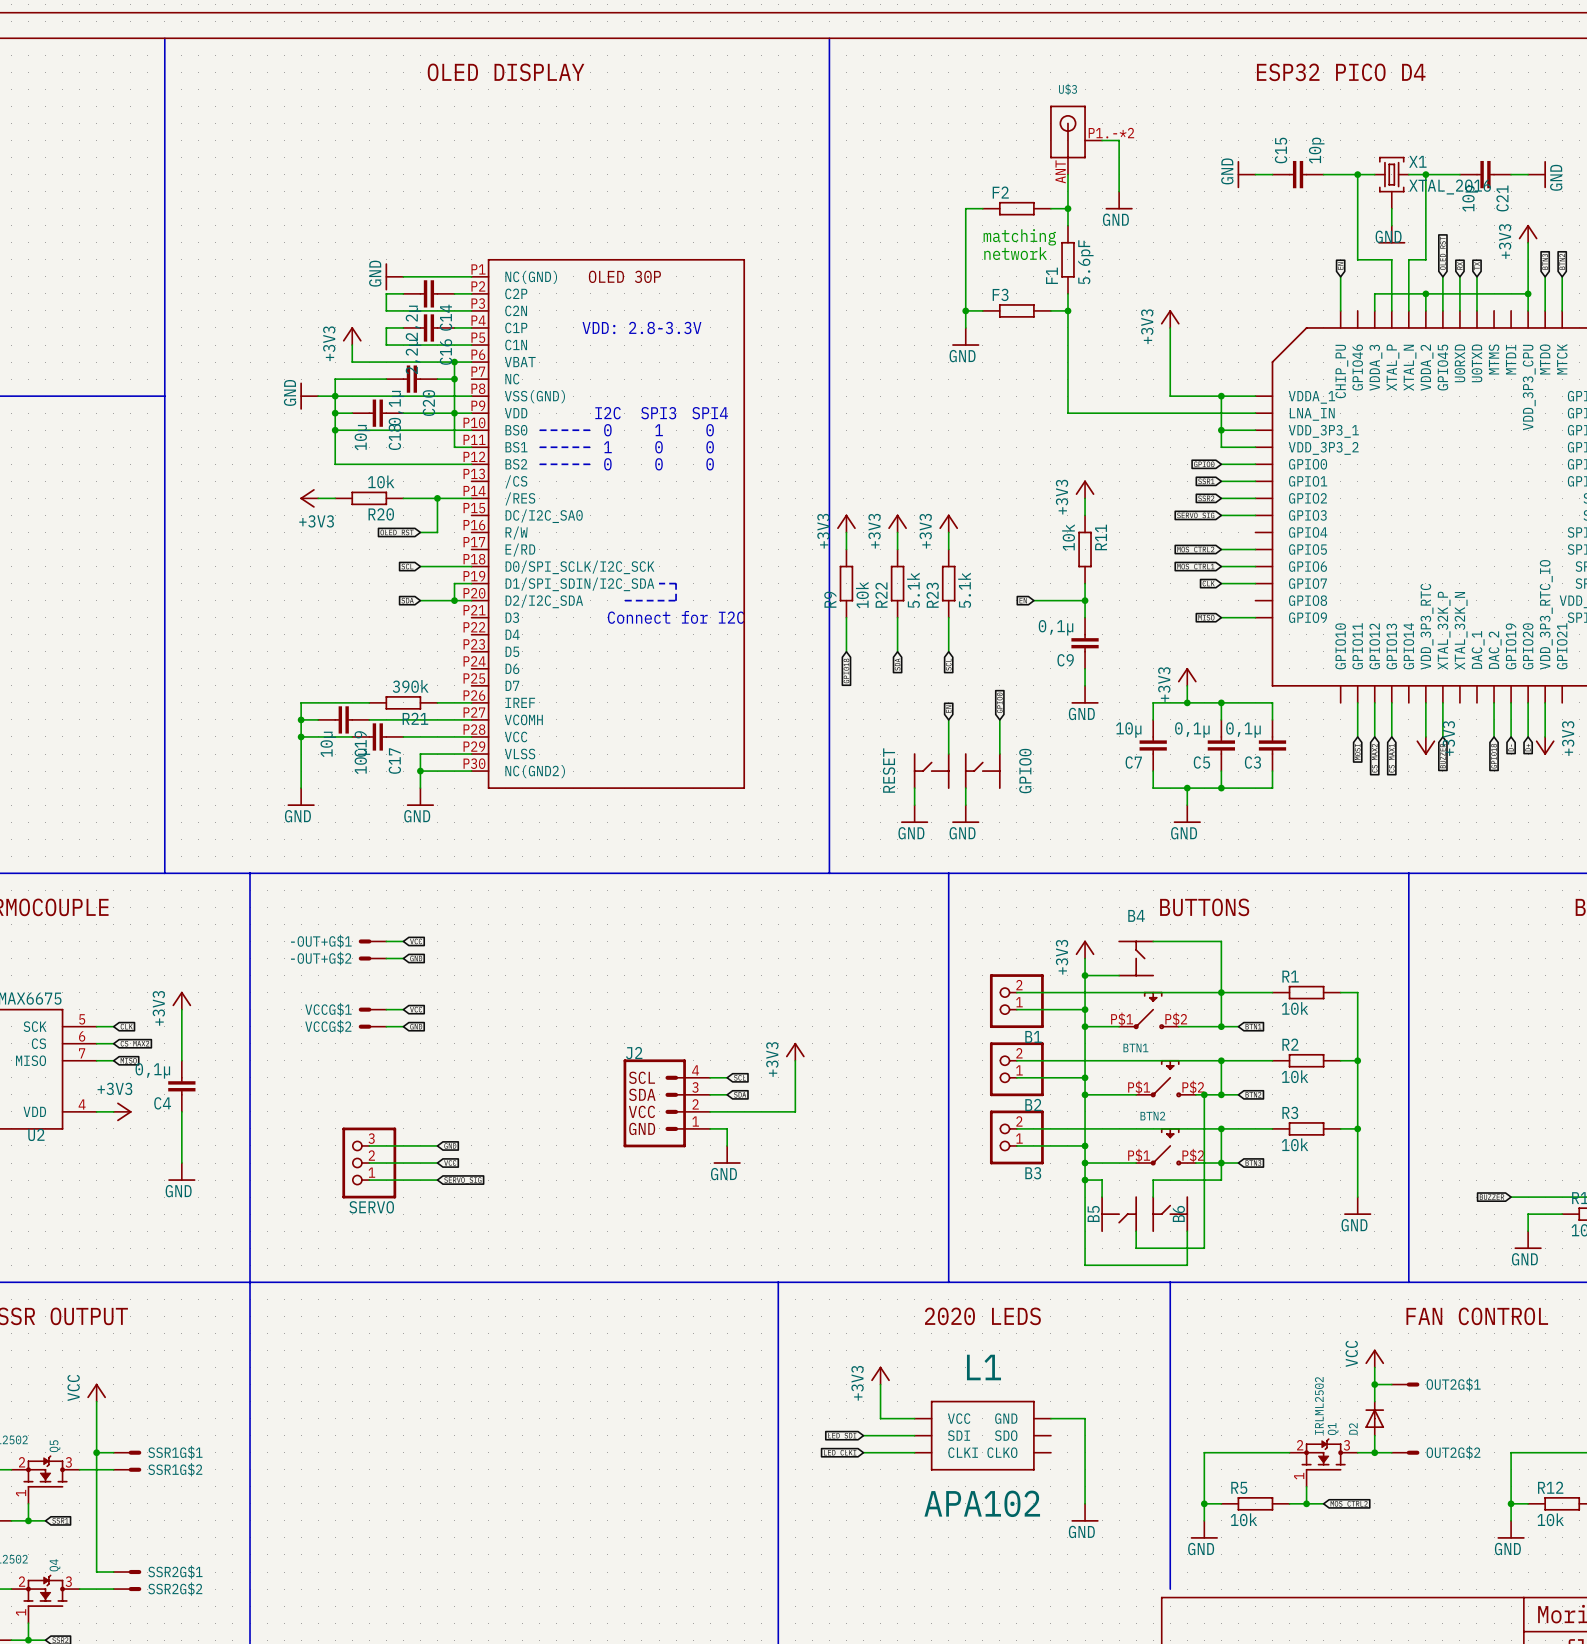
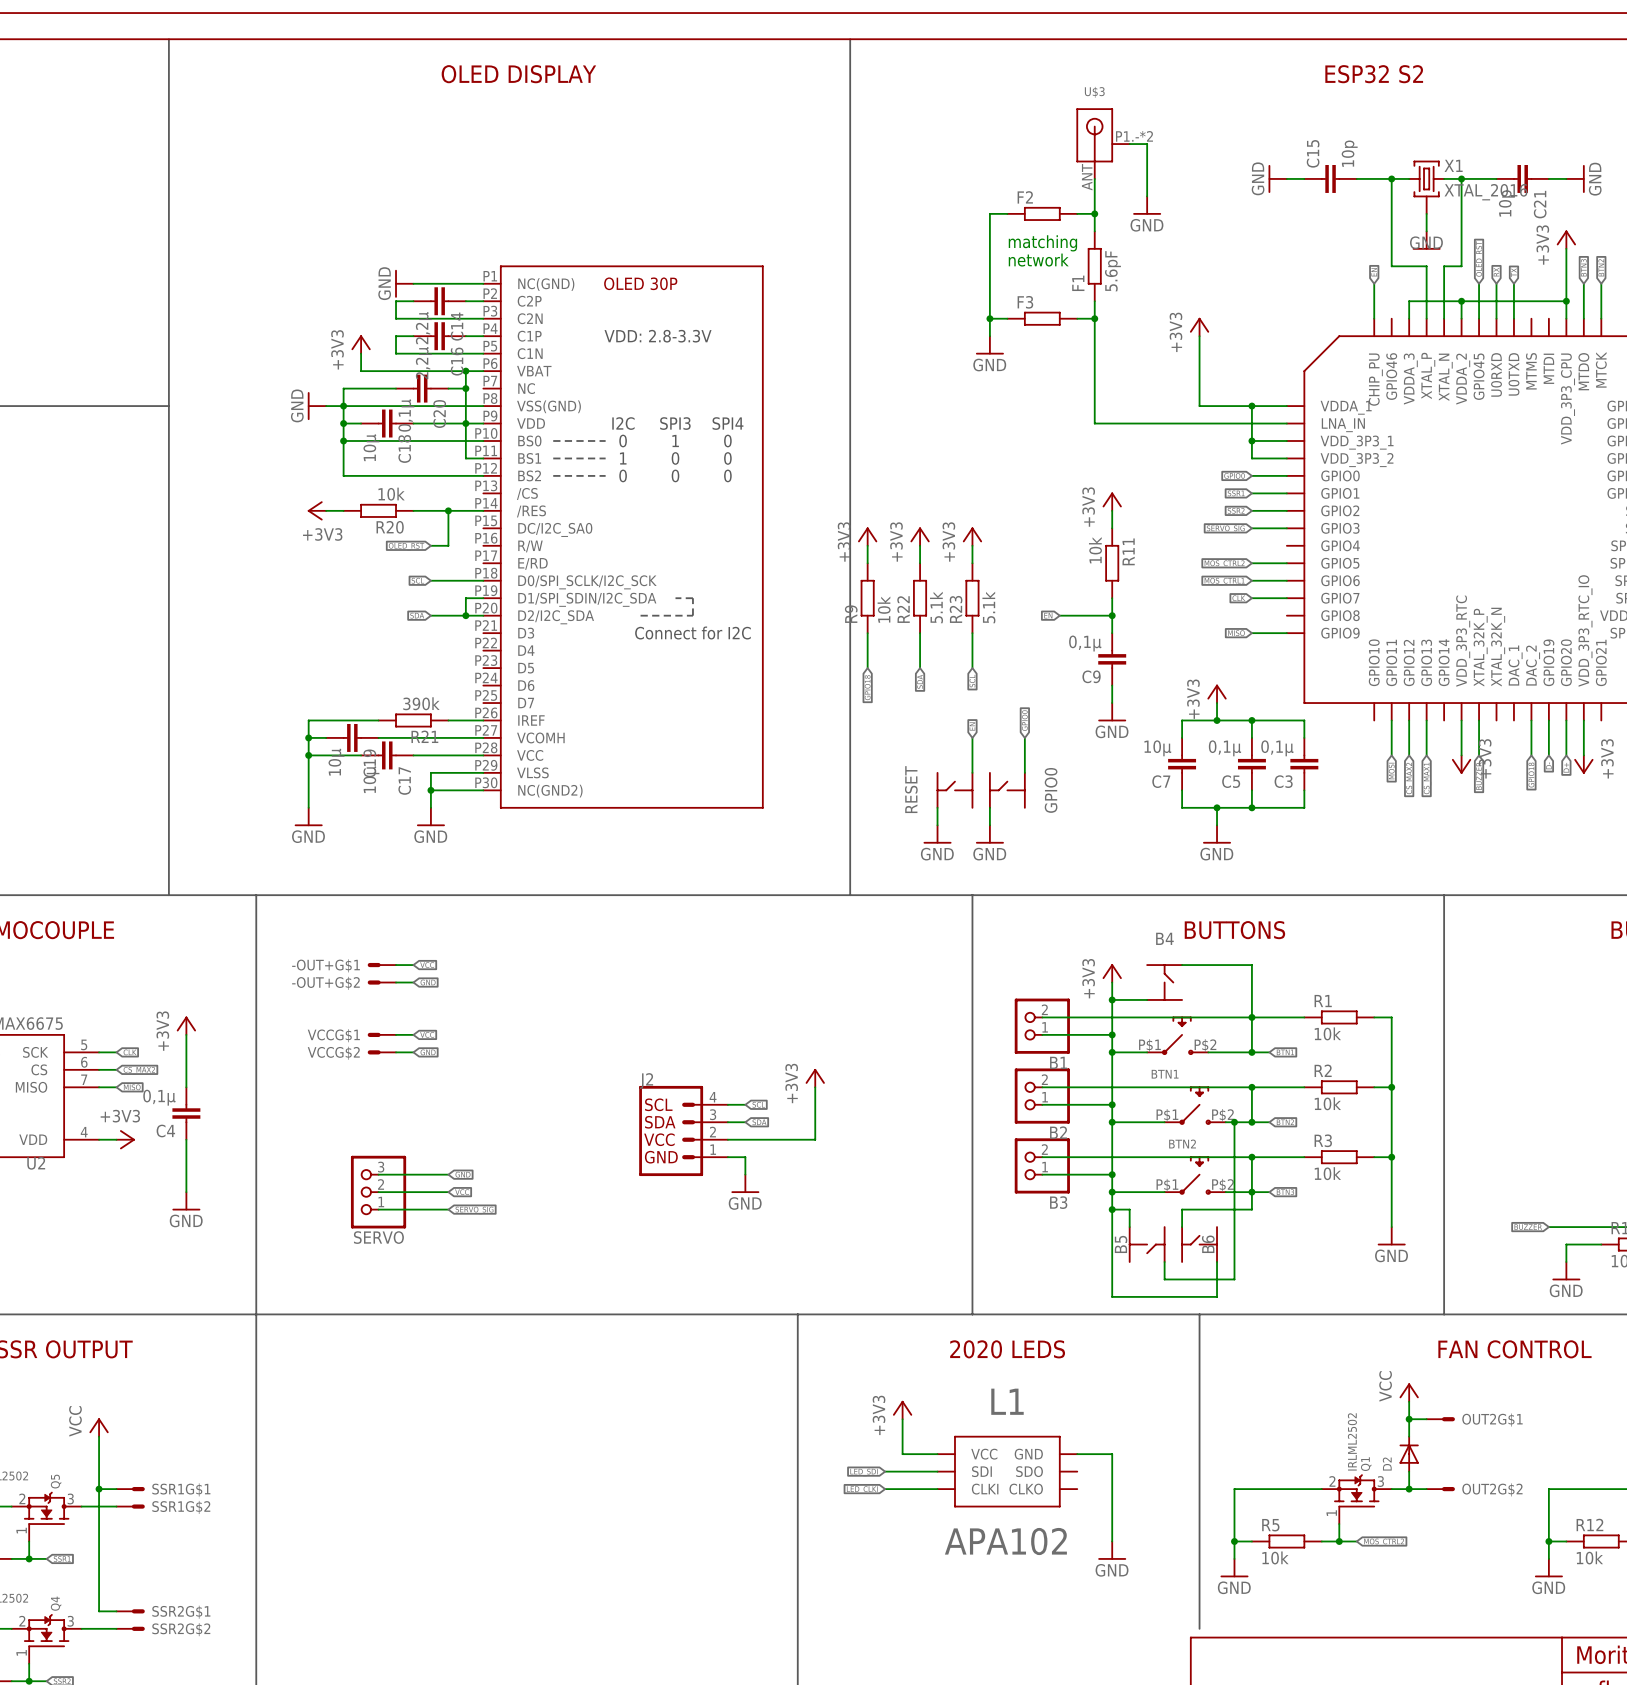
text: ESP32 PICO D4 (1341, 72) -> ESP32 S2 (1374, 74)

